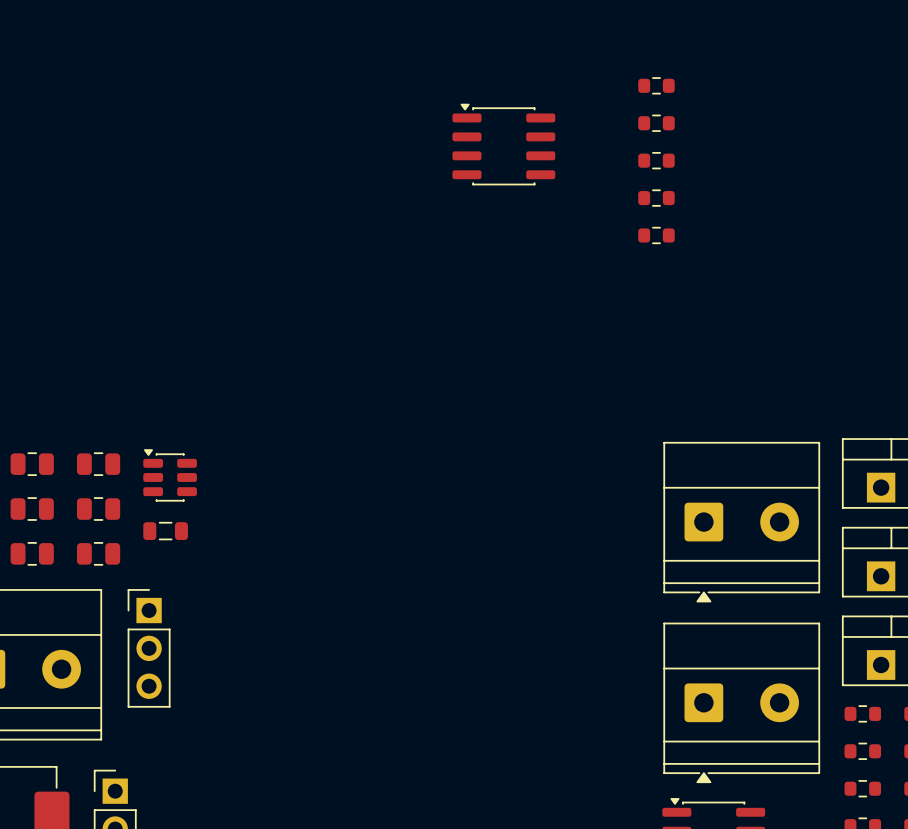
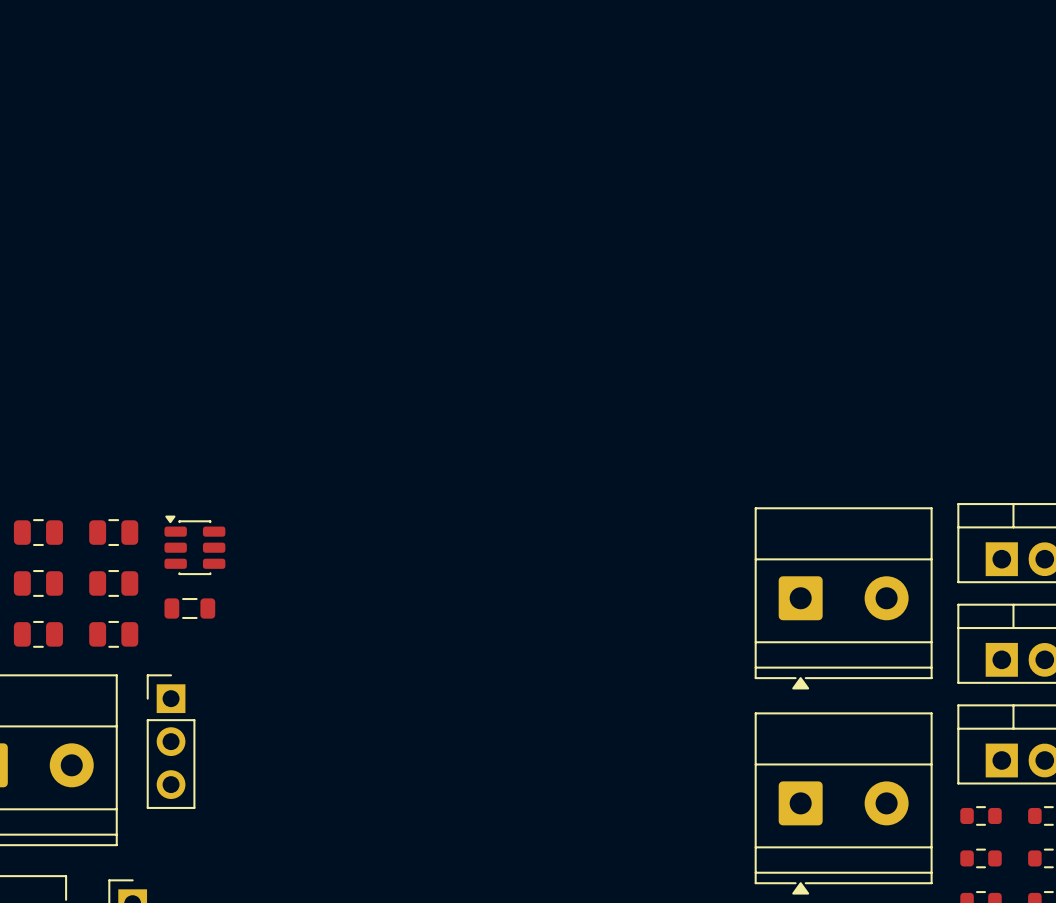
part: (656, 85) -> none
part: (656, 123) -> none
part: (503, 144) -> none
part: (656, 160) -> none
part: (656, 198) -> none
part: (656, 235) -> none

